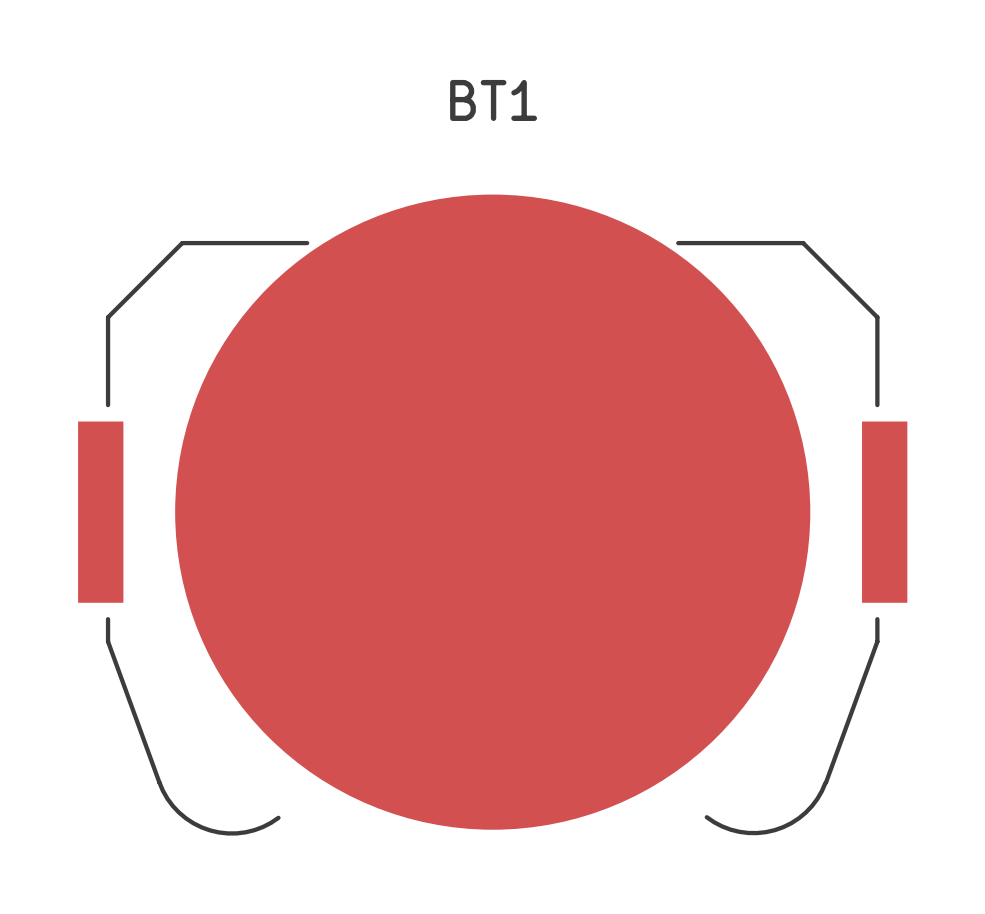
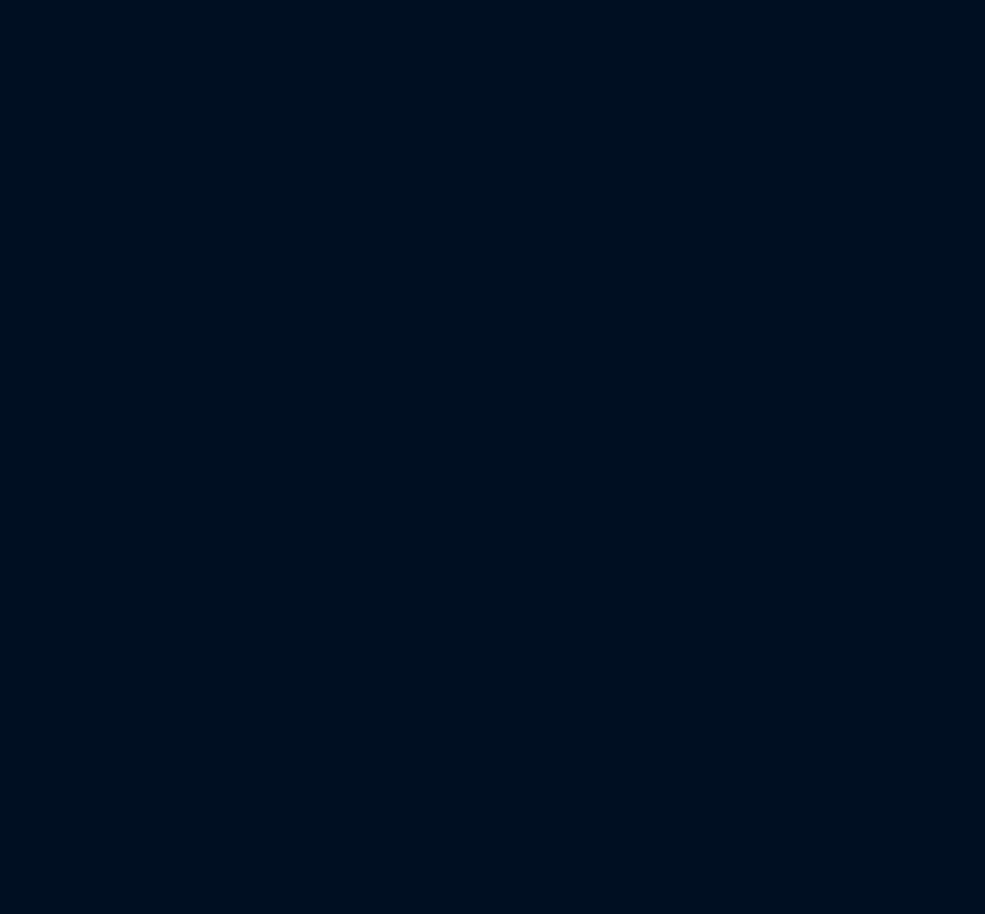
BT1: (492, 515) -> none

